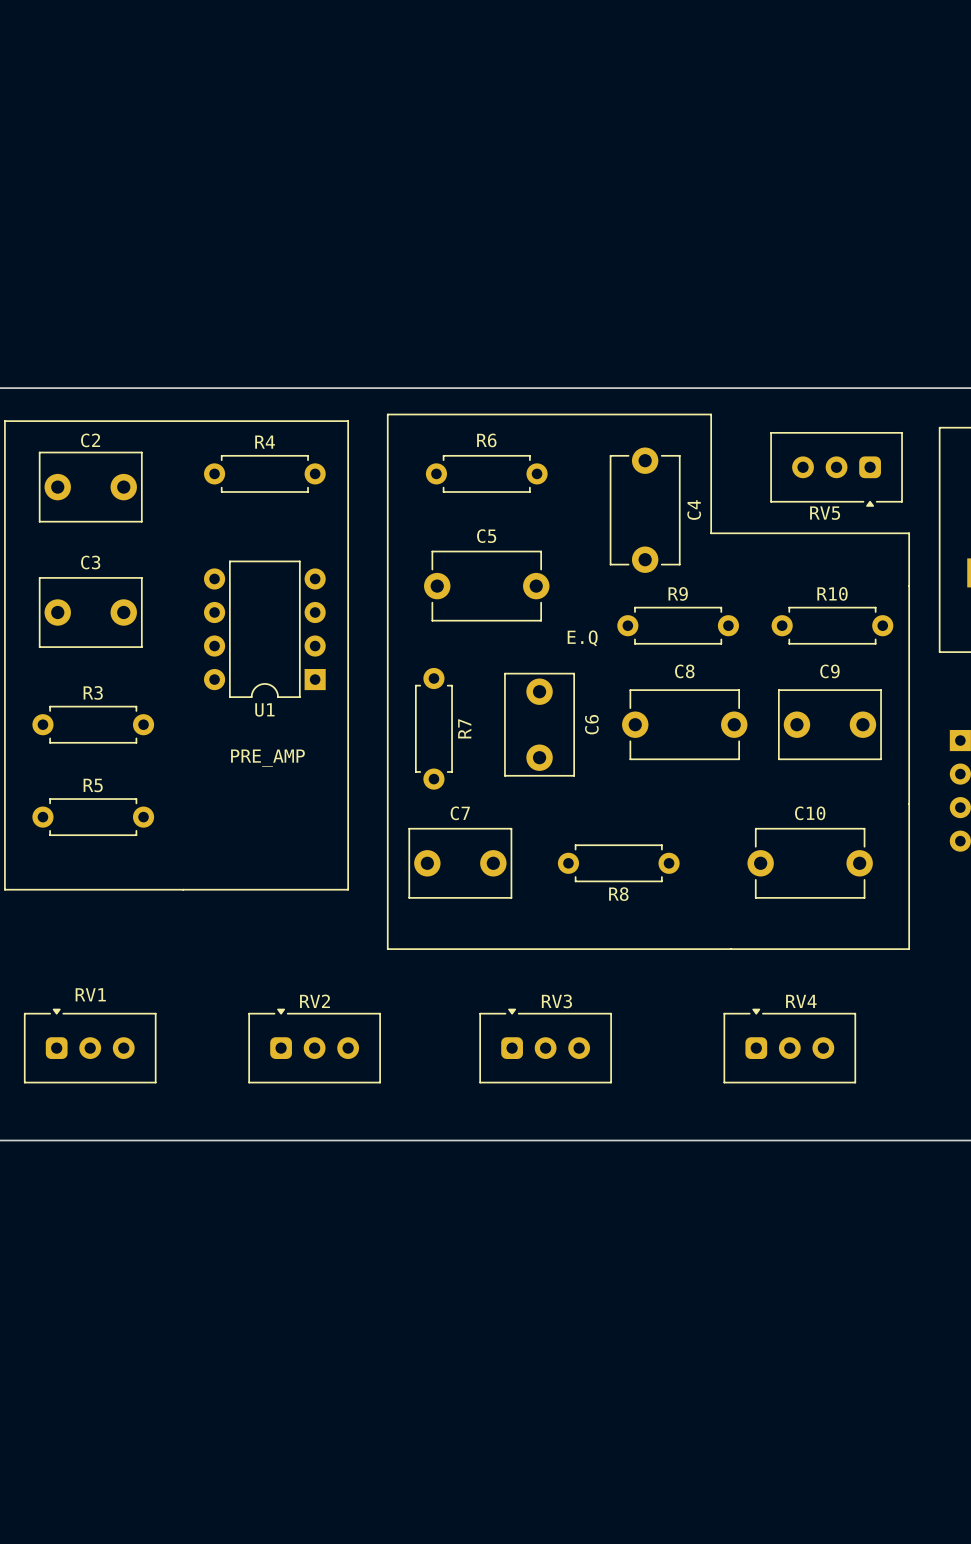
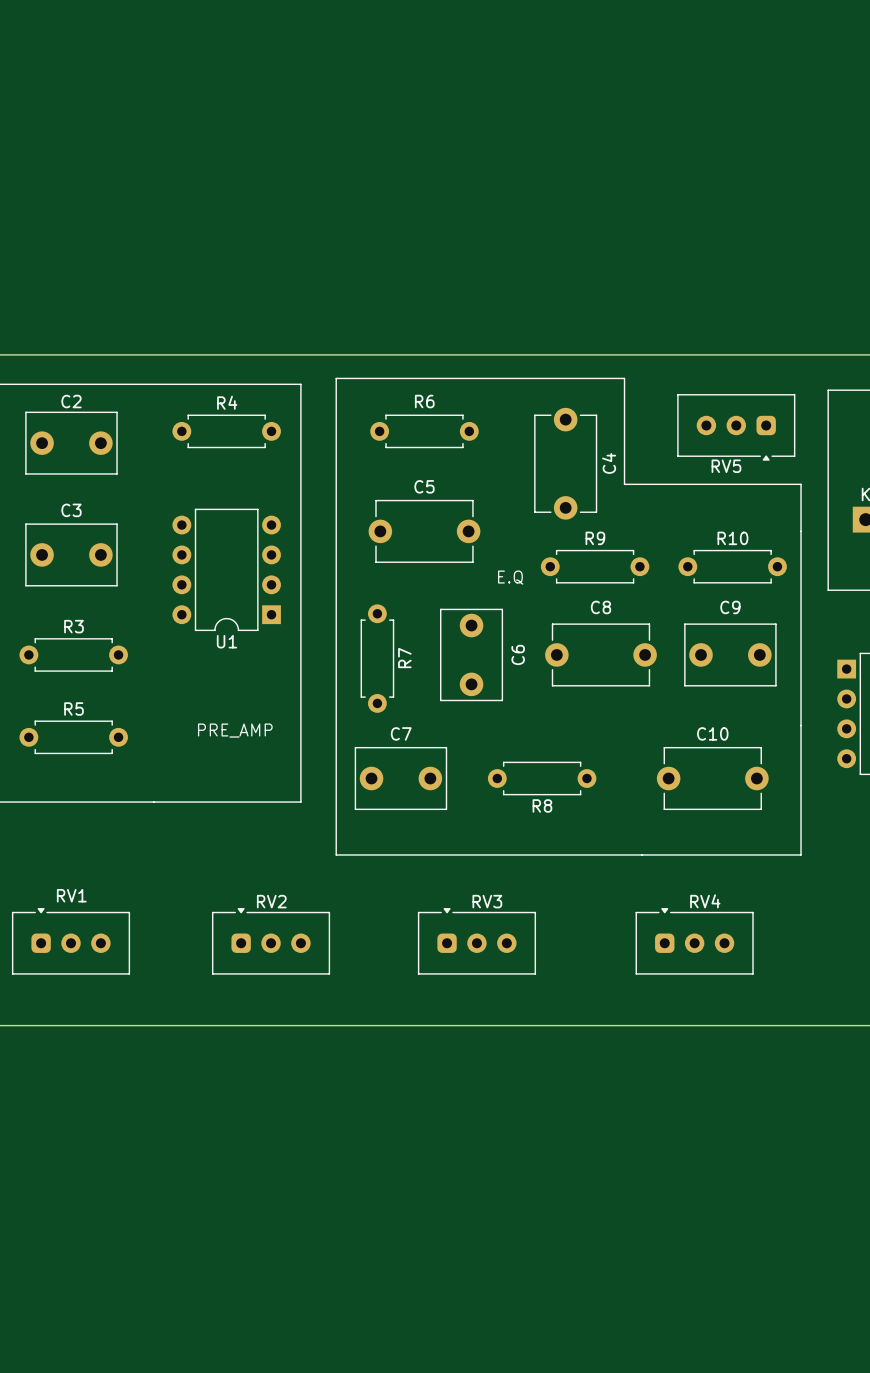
text position: PRE_AMP (267, 758) -> PRE_AMP (235, 730)

